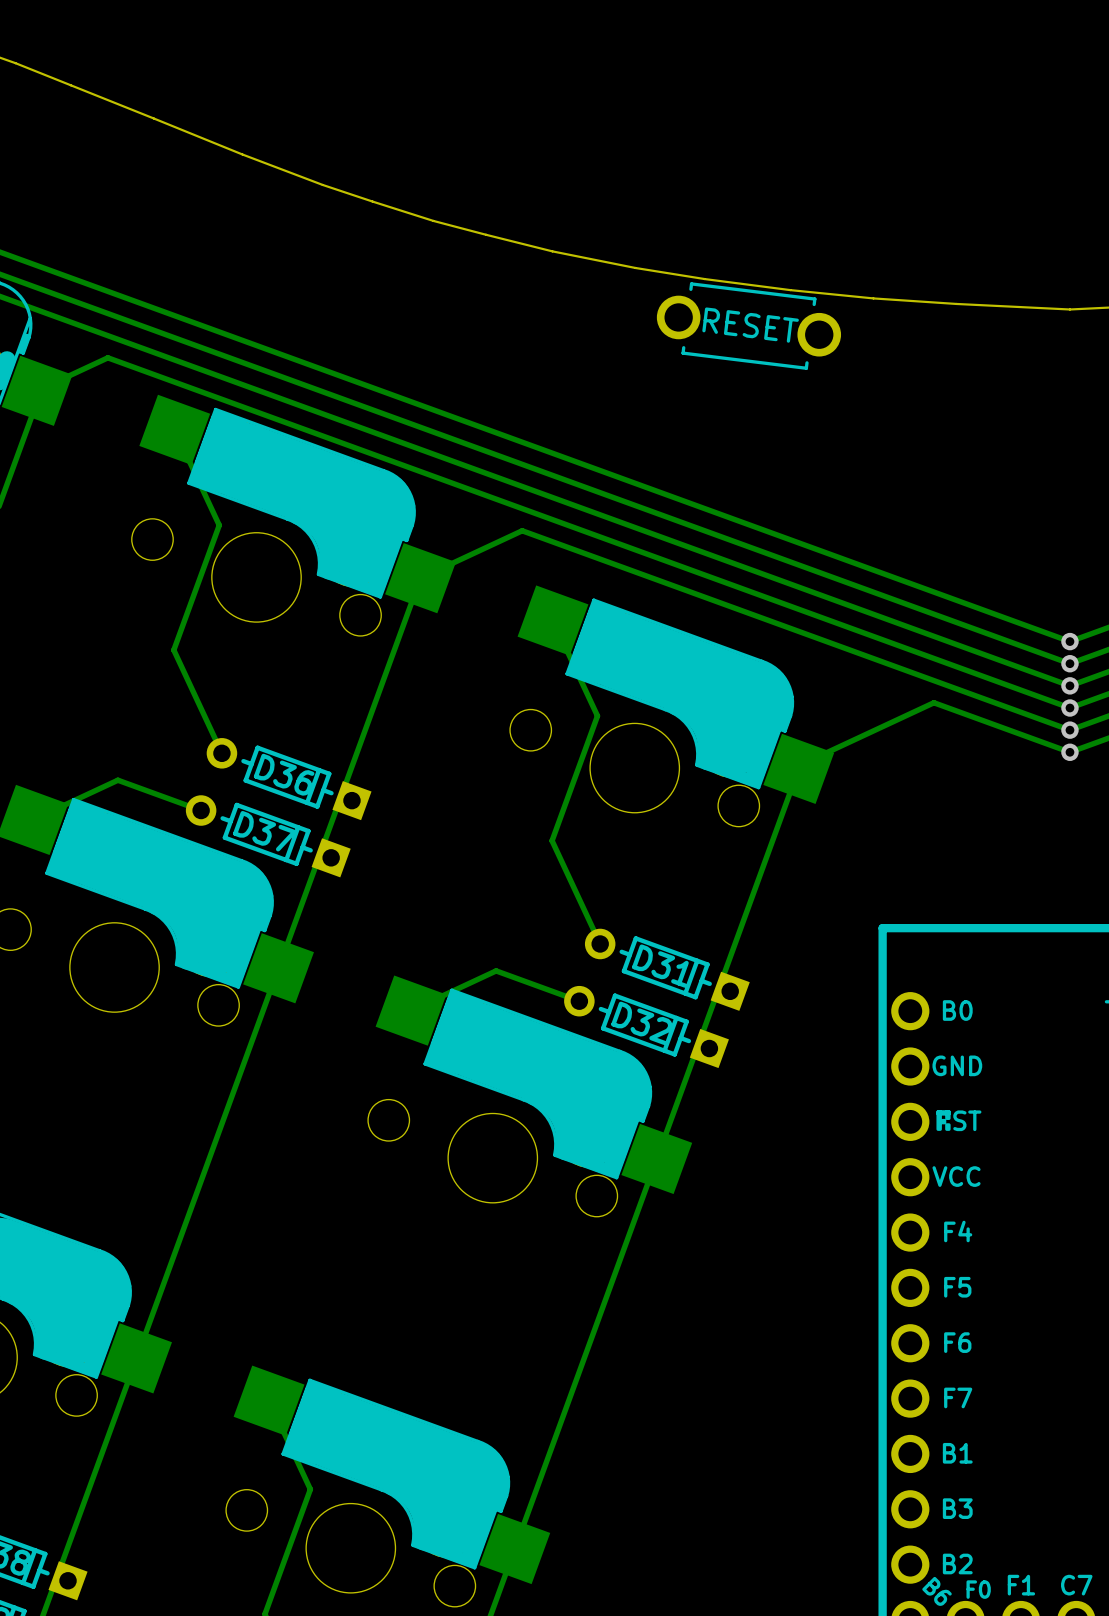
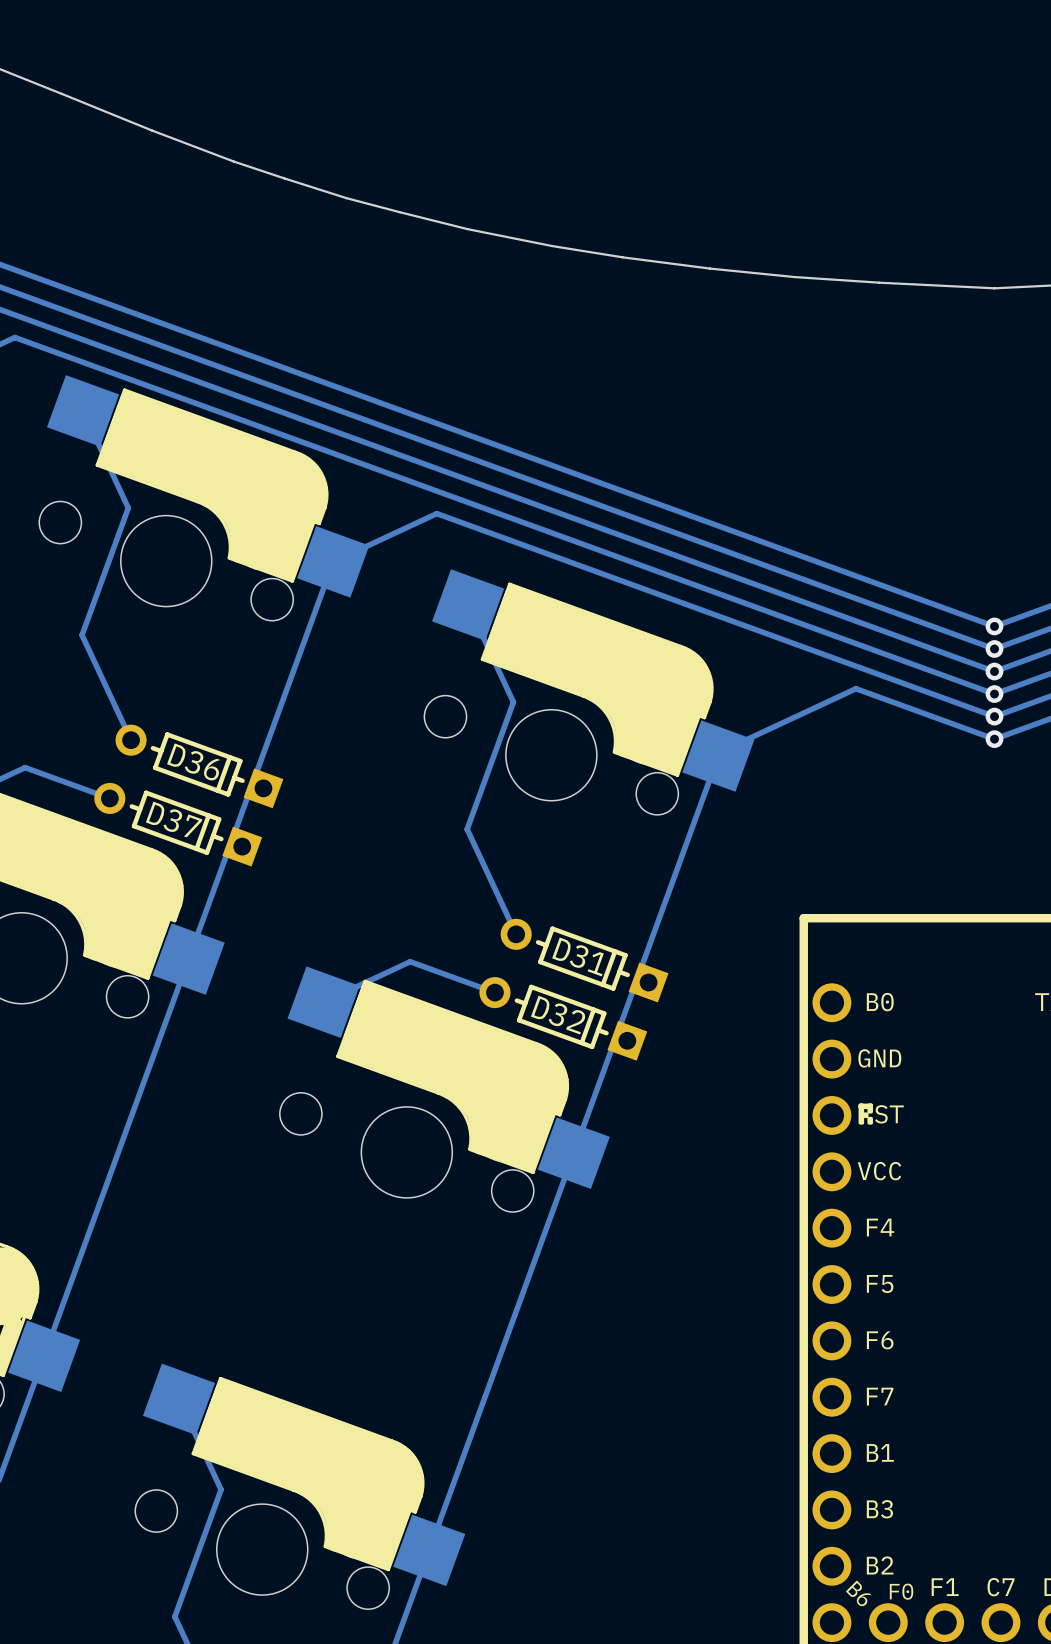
part: (748, 326) -> none

